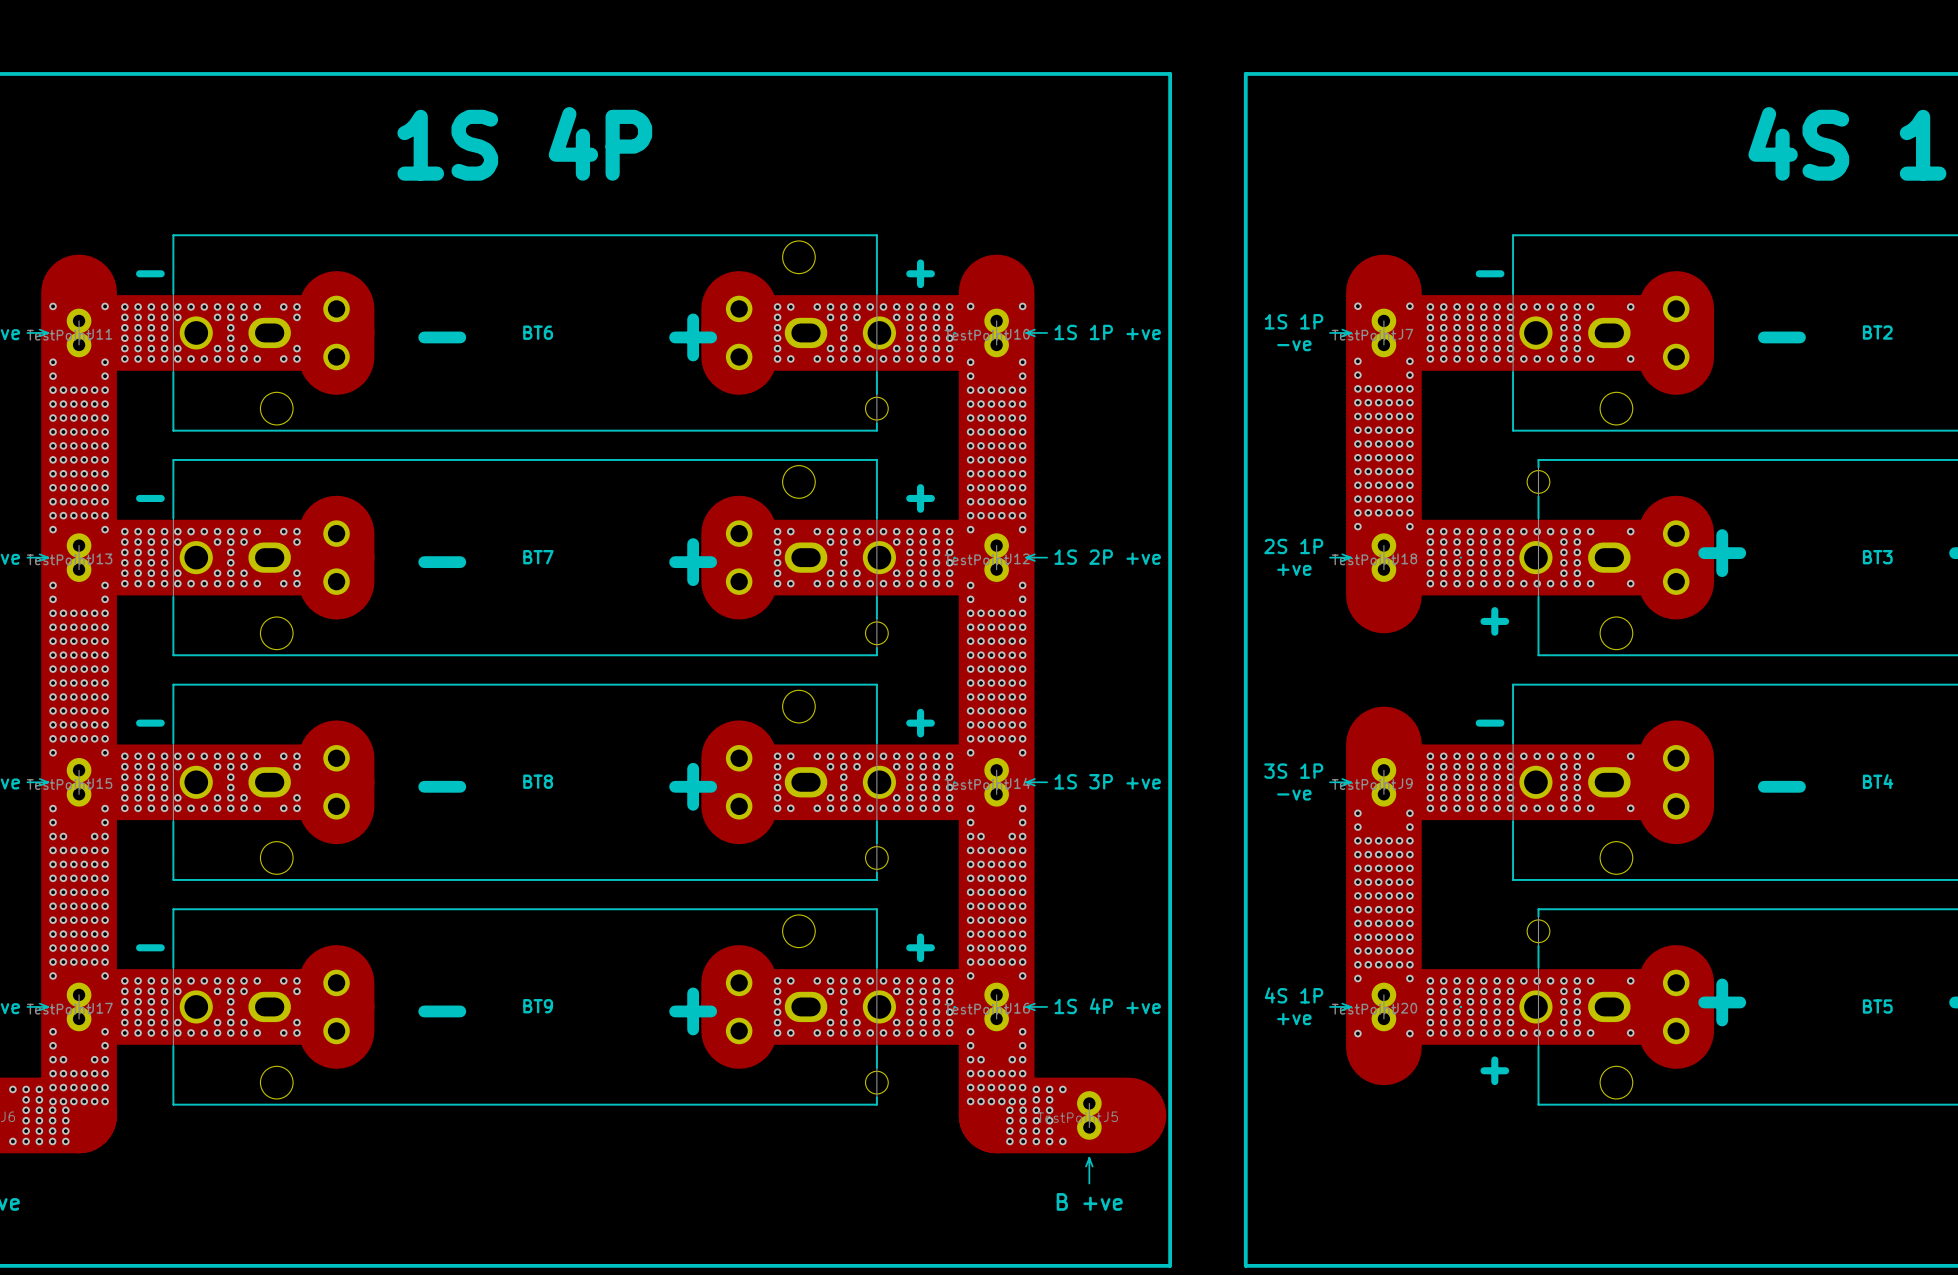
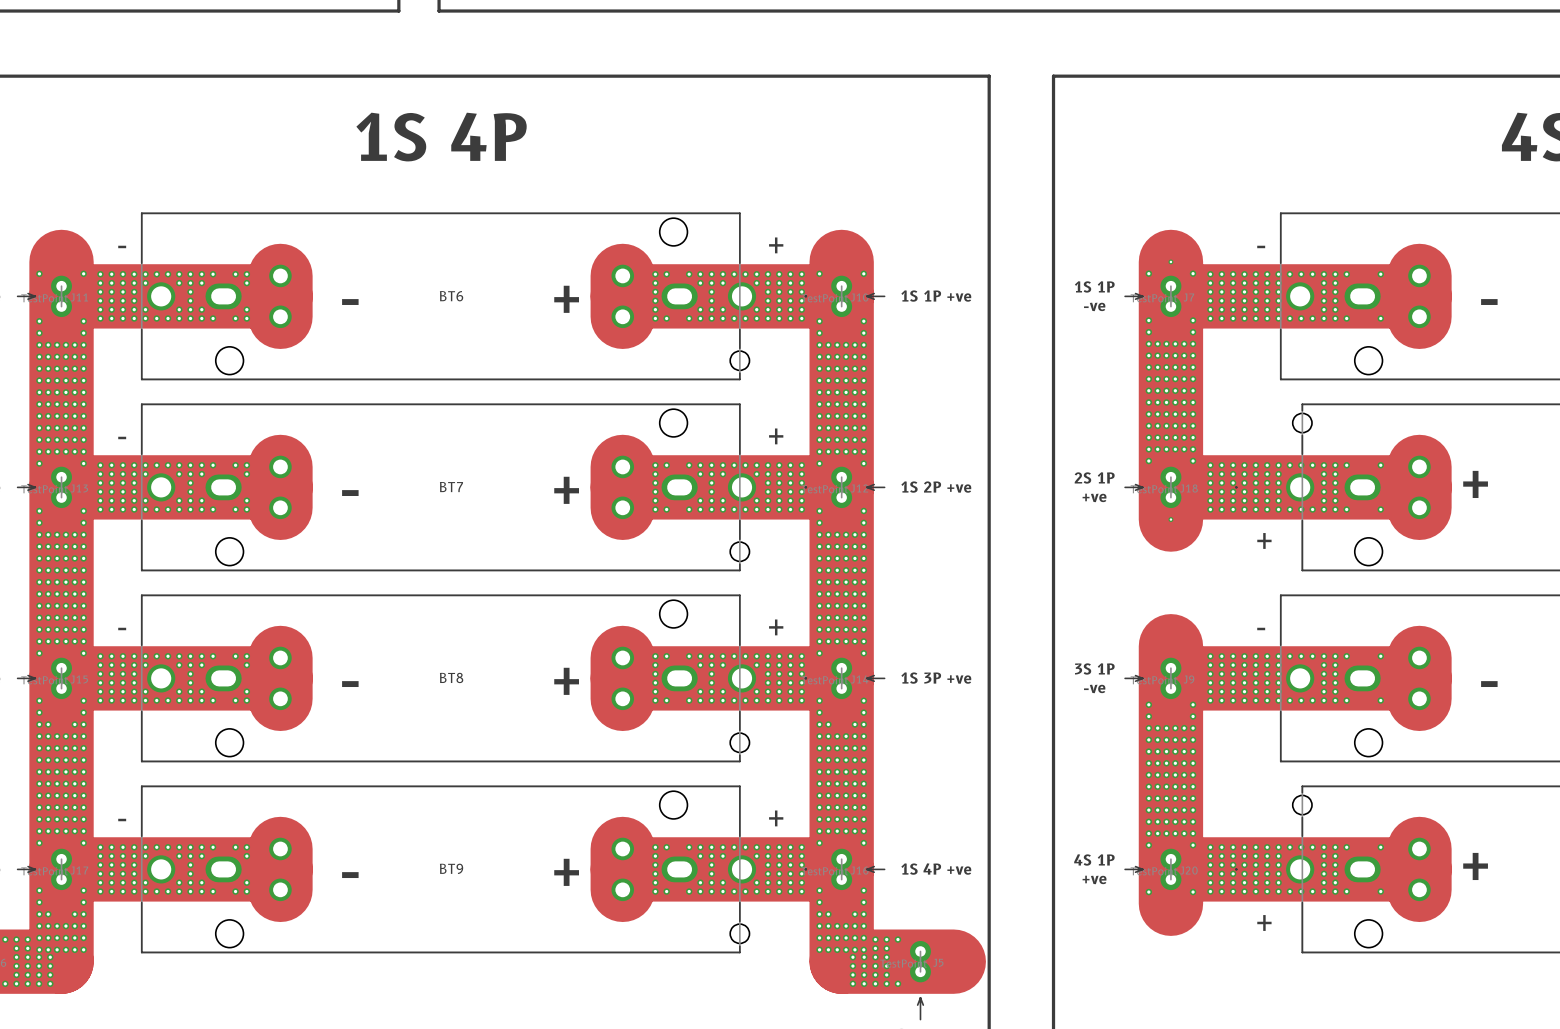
via: none -> (1170, 261)
via: none -> (1170, 519)

